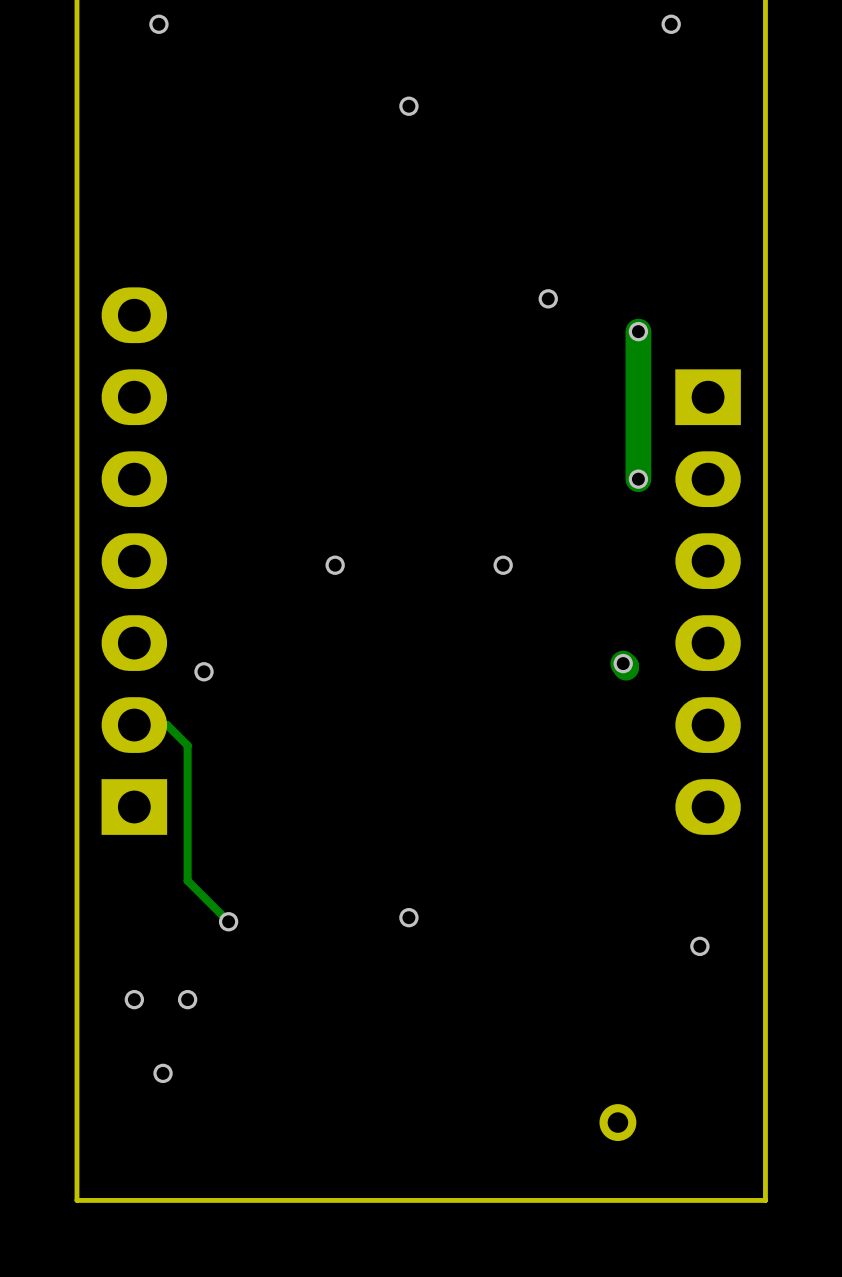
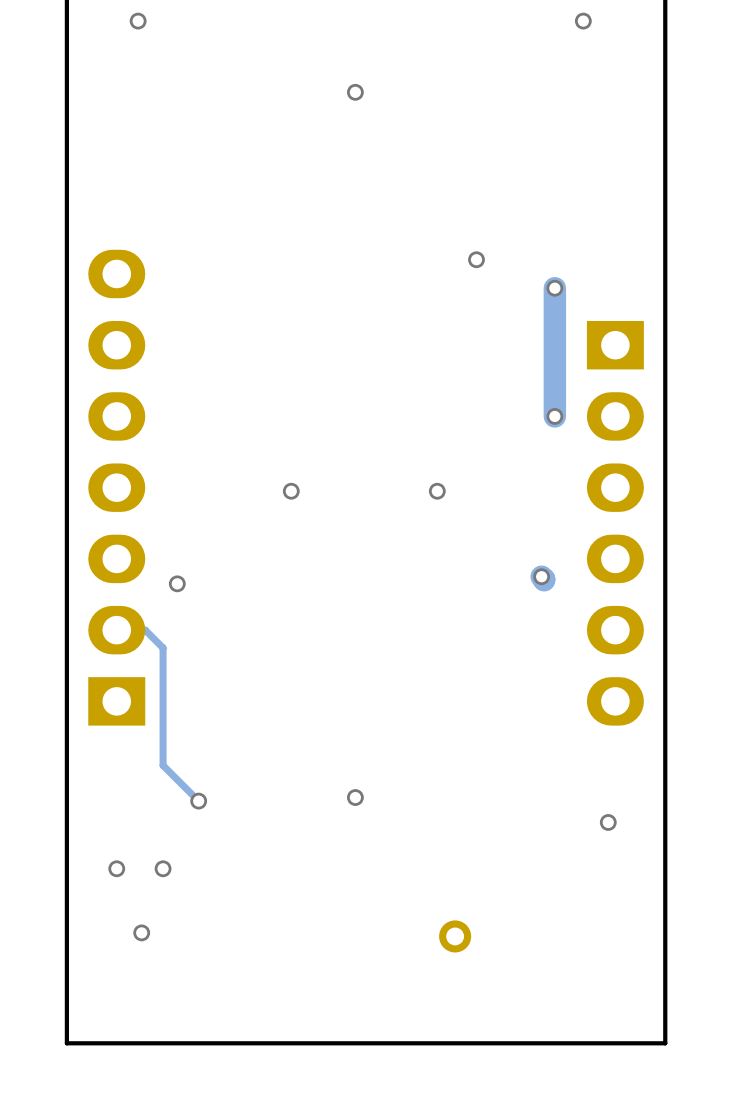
part position: (617, 1122) -> (455, 936)

